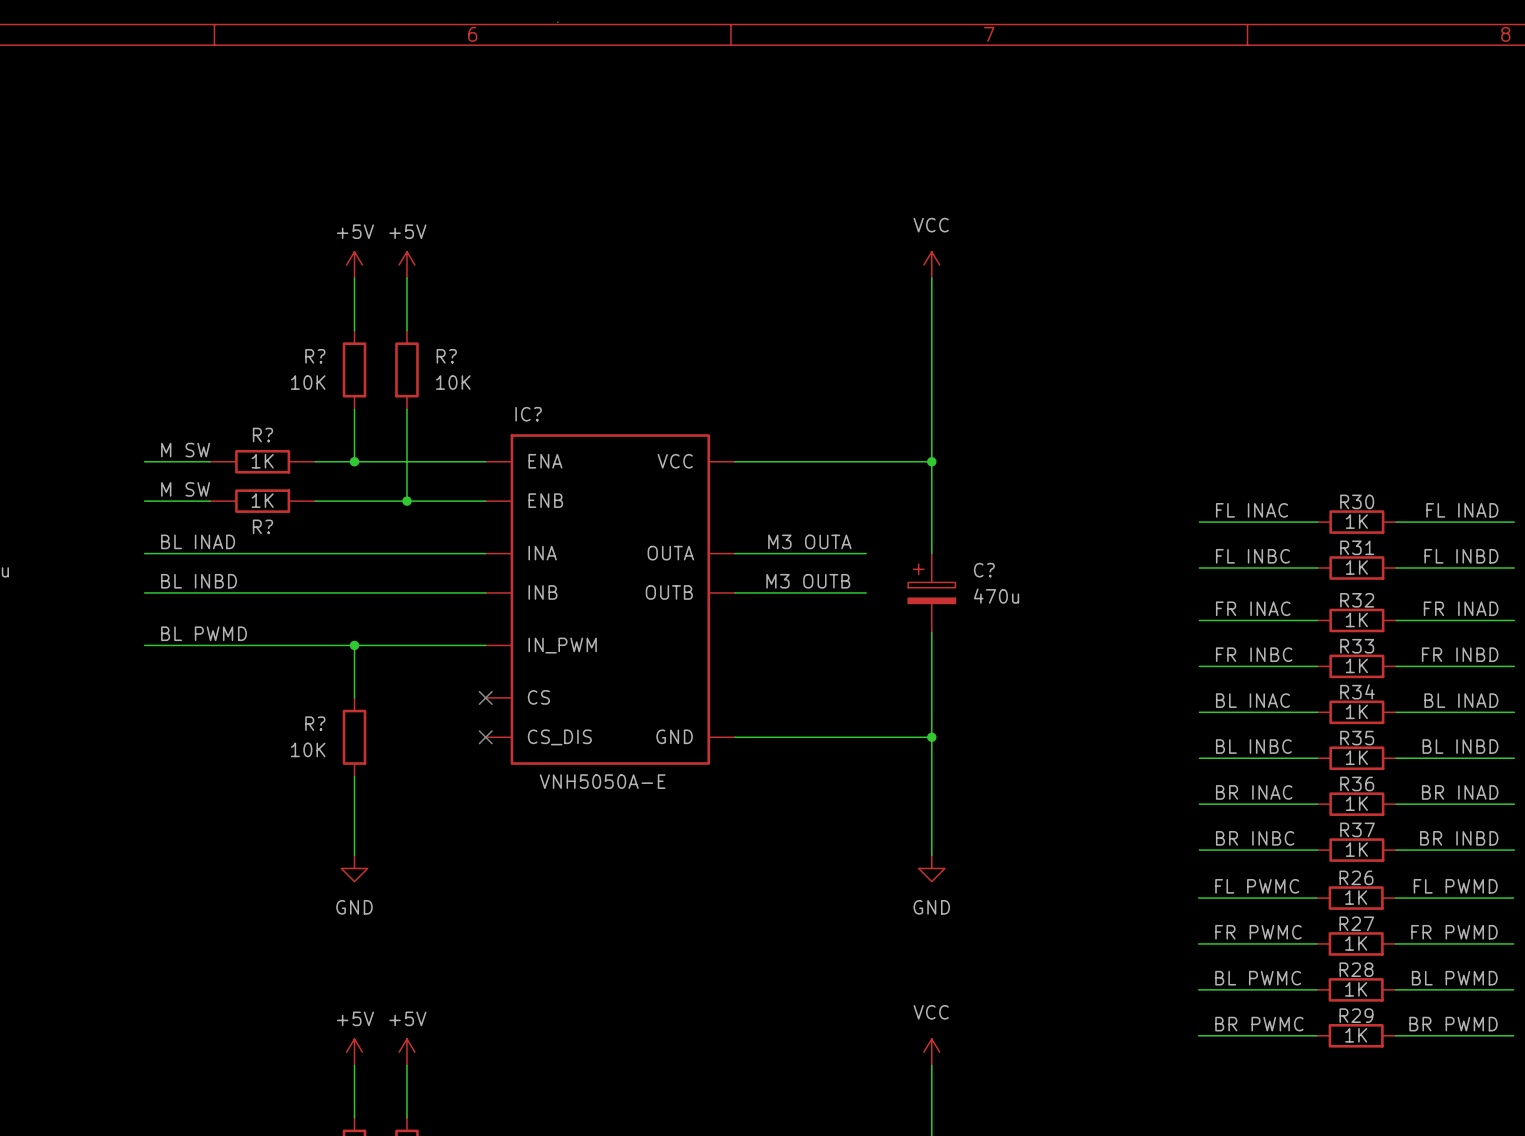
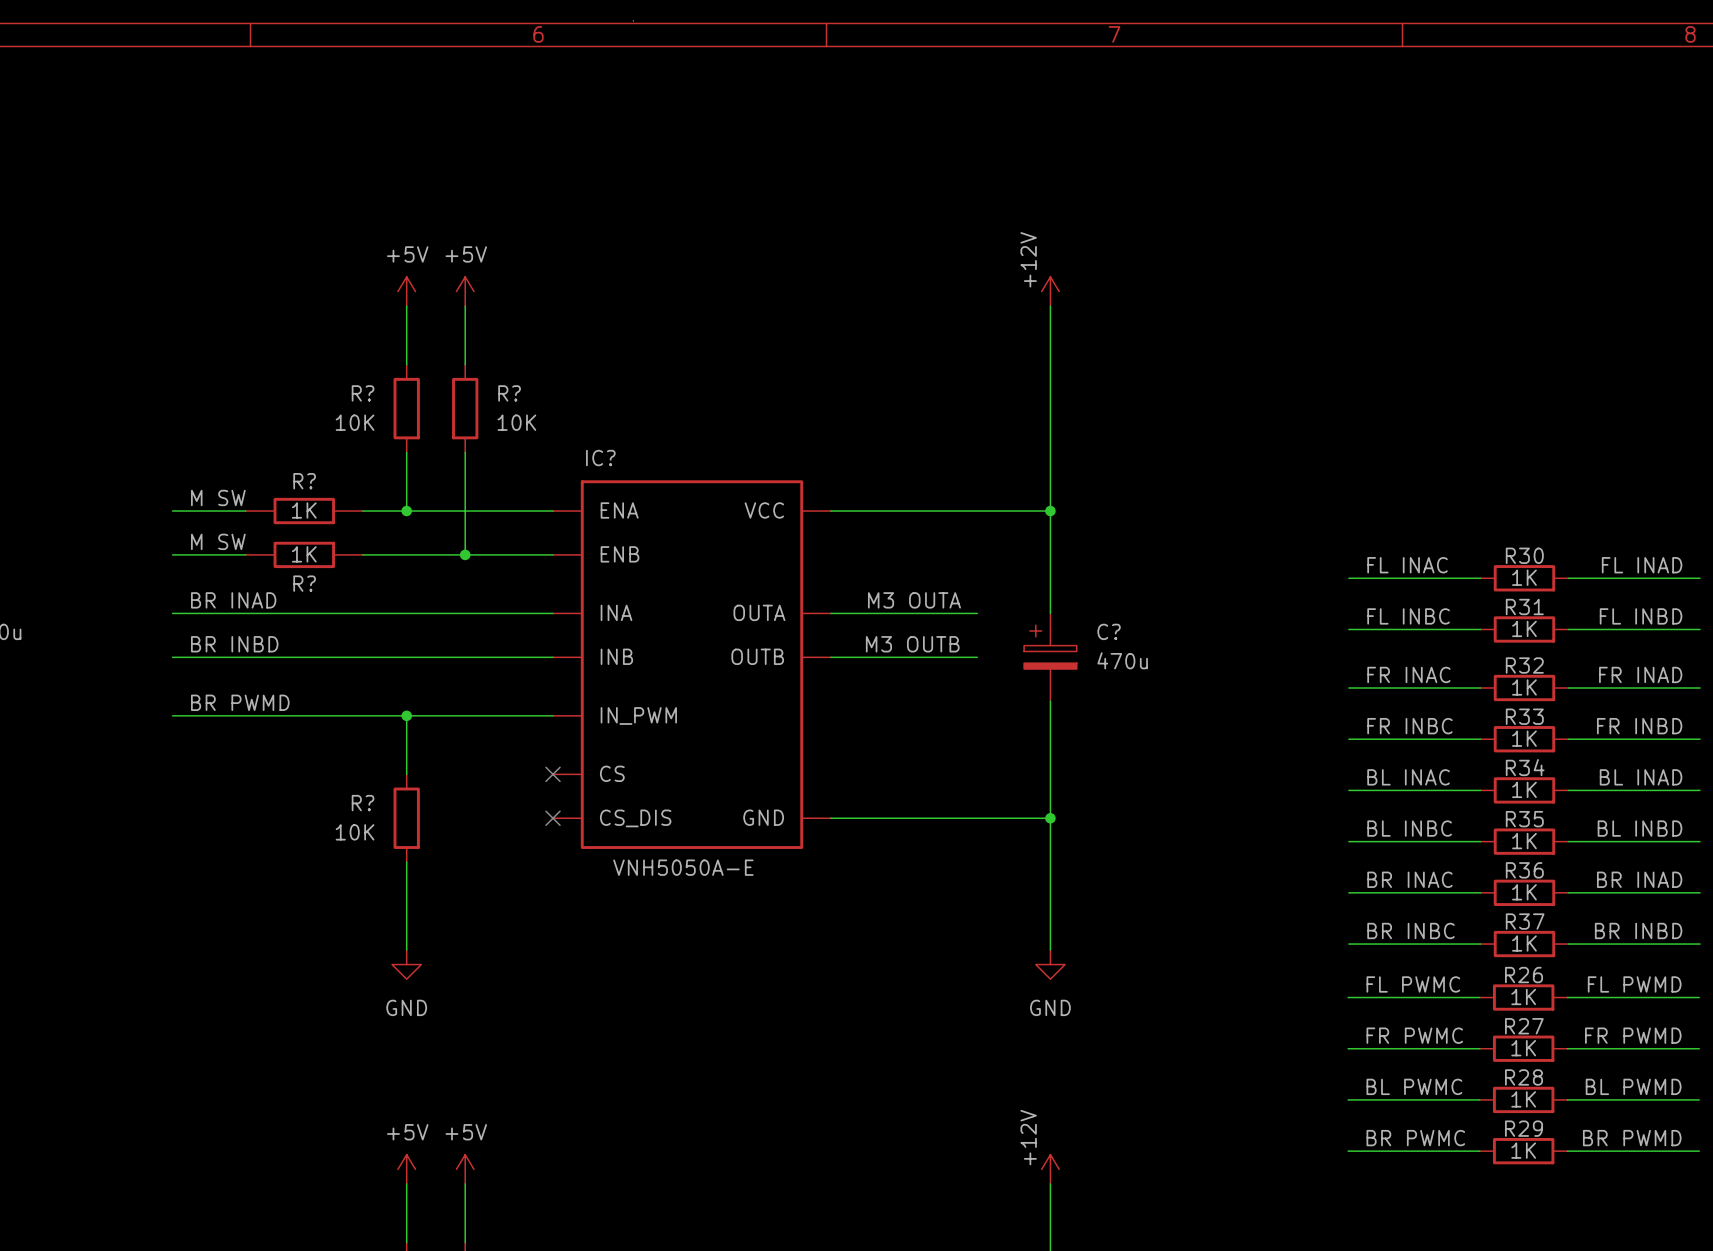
power symbol: VCC (931, 264) -> +12V (1050, 291)
label: BL INAD (198, 541) -> BR INAD (233, 600)
label: BL INBD (199, 581) -> BR INBD (234, 644)
label: BL PWMD (204, 633) -> BR PWMD (240, 702)
power symbol: VCC (931, 1052) -> +12V (1050, 1169)

